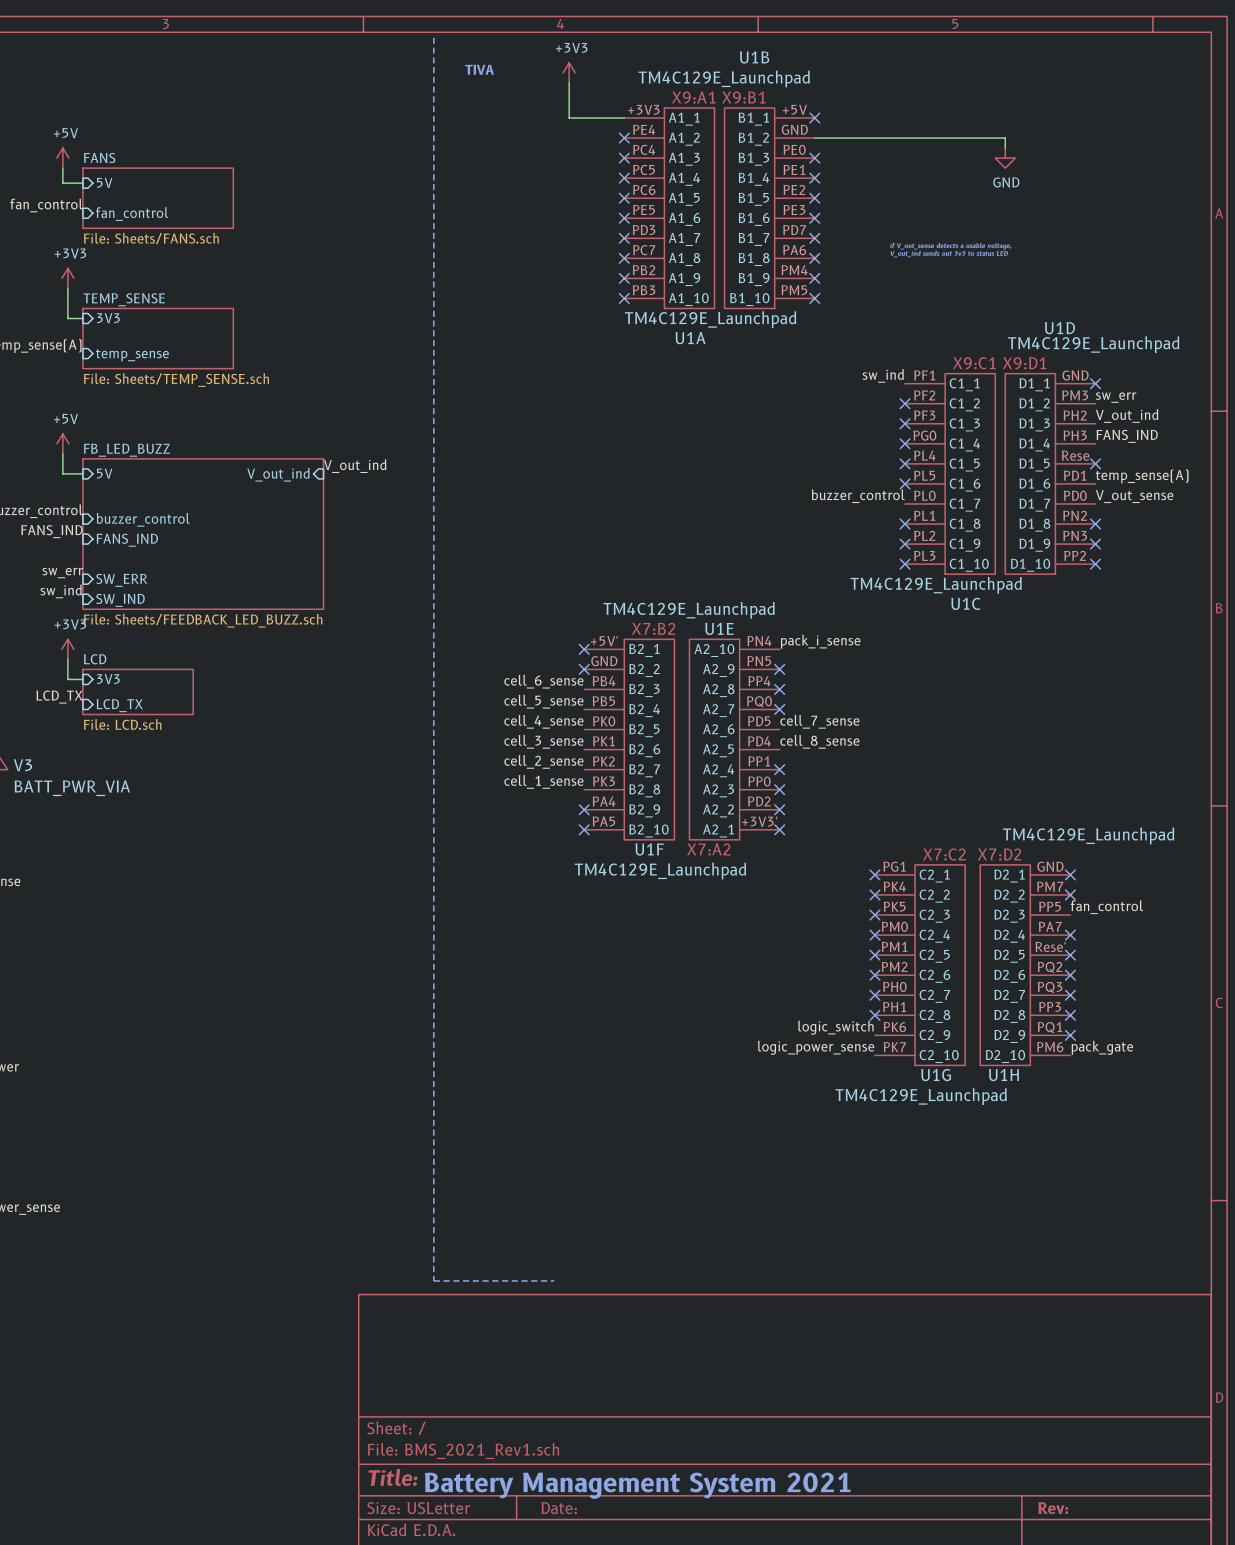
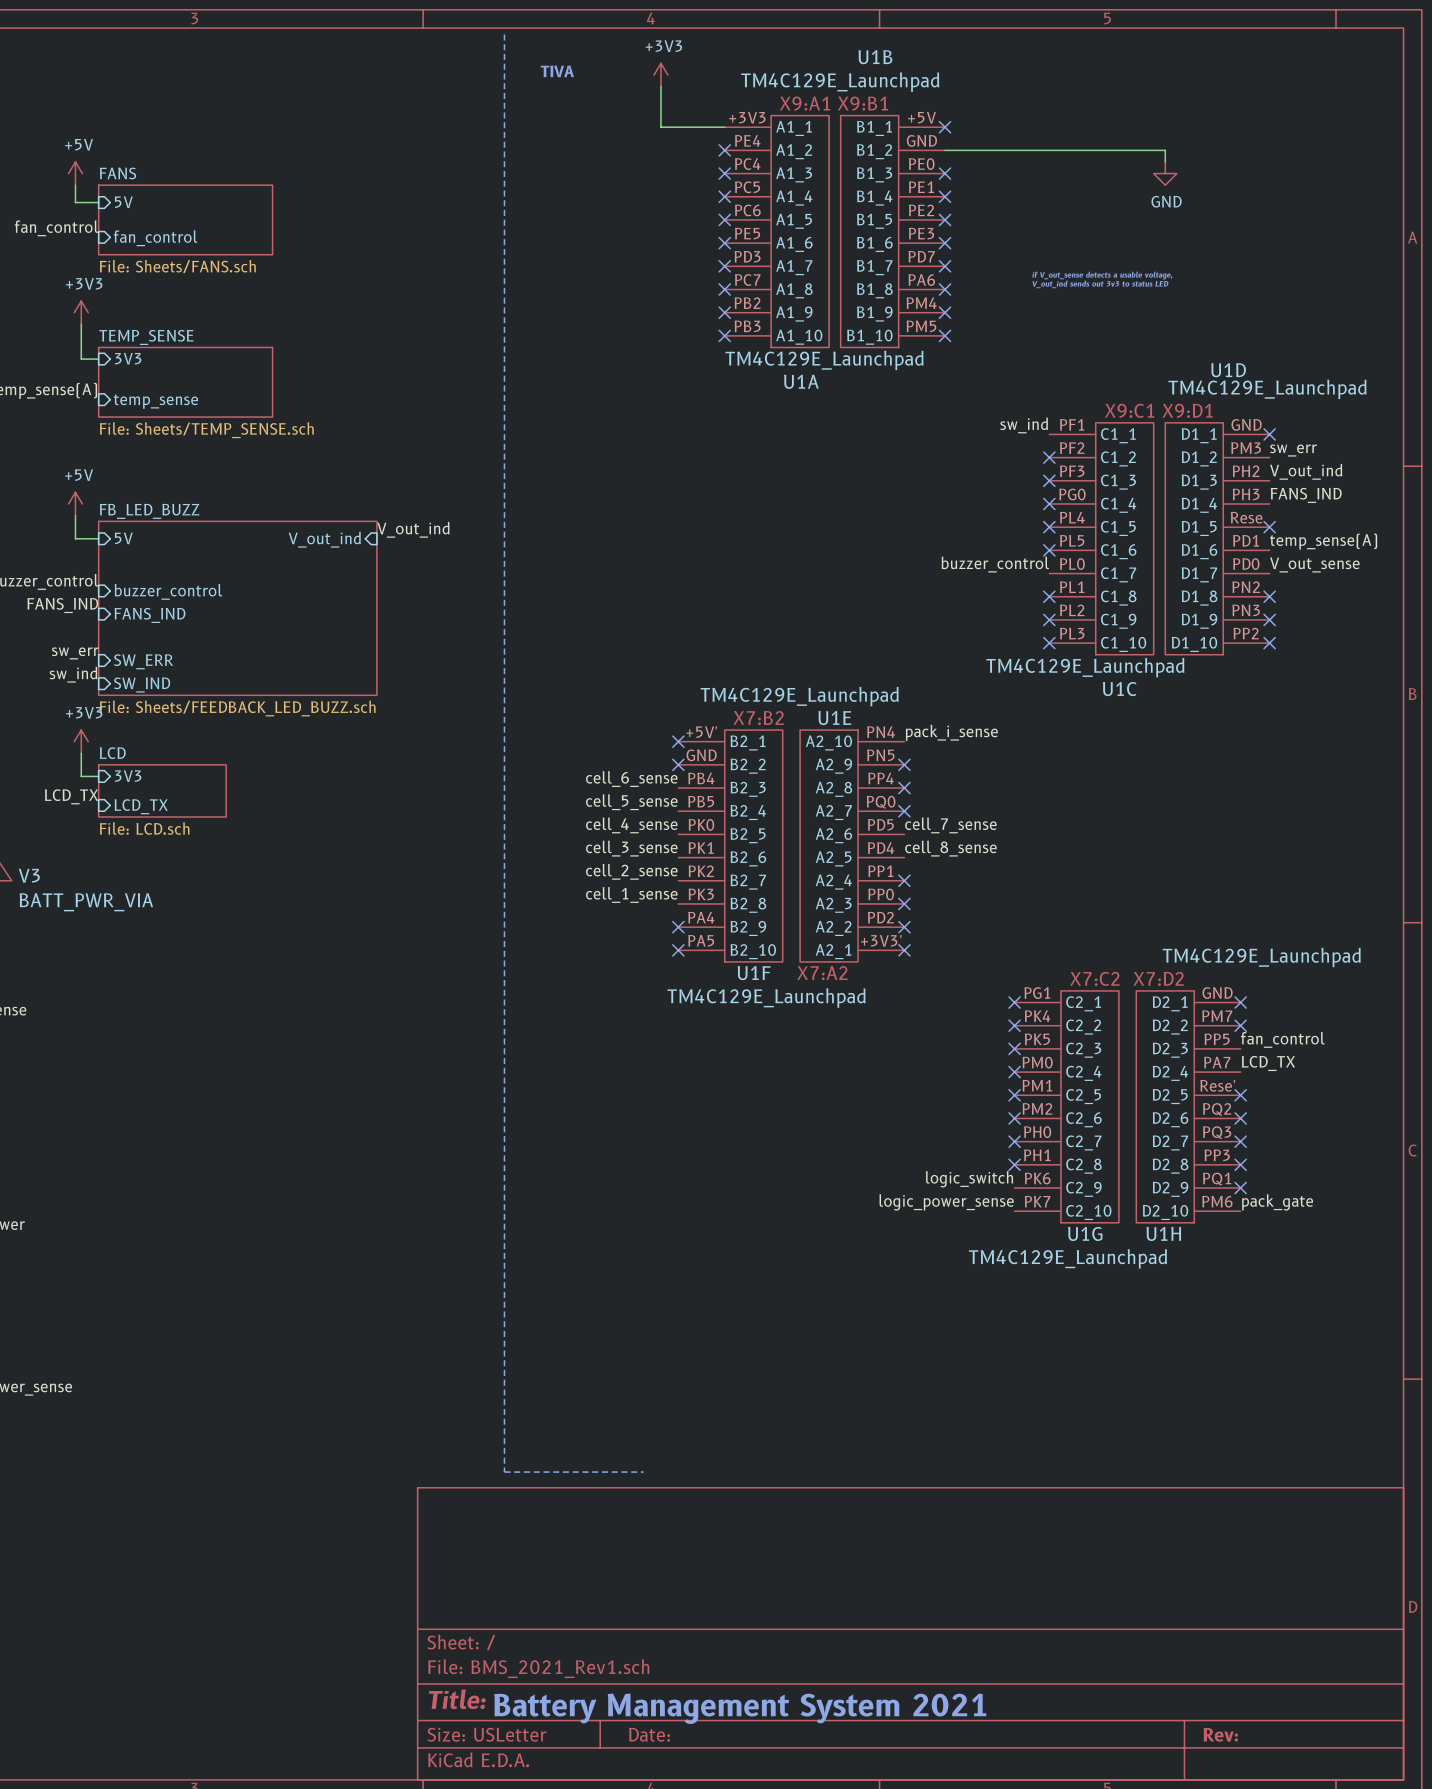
label: none -> LCD_TX (1268, 1063)
no-connect mark: (1070, 935) -> none

